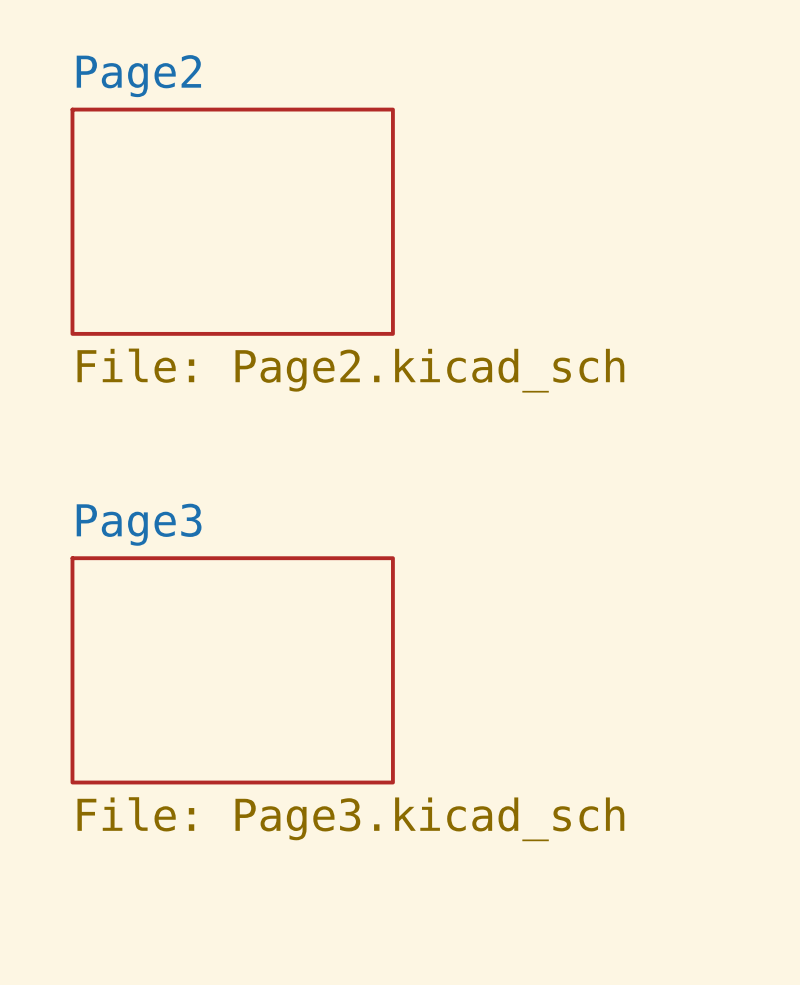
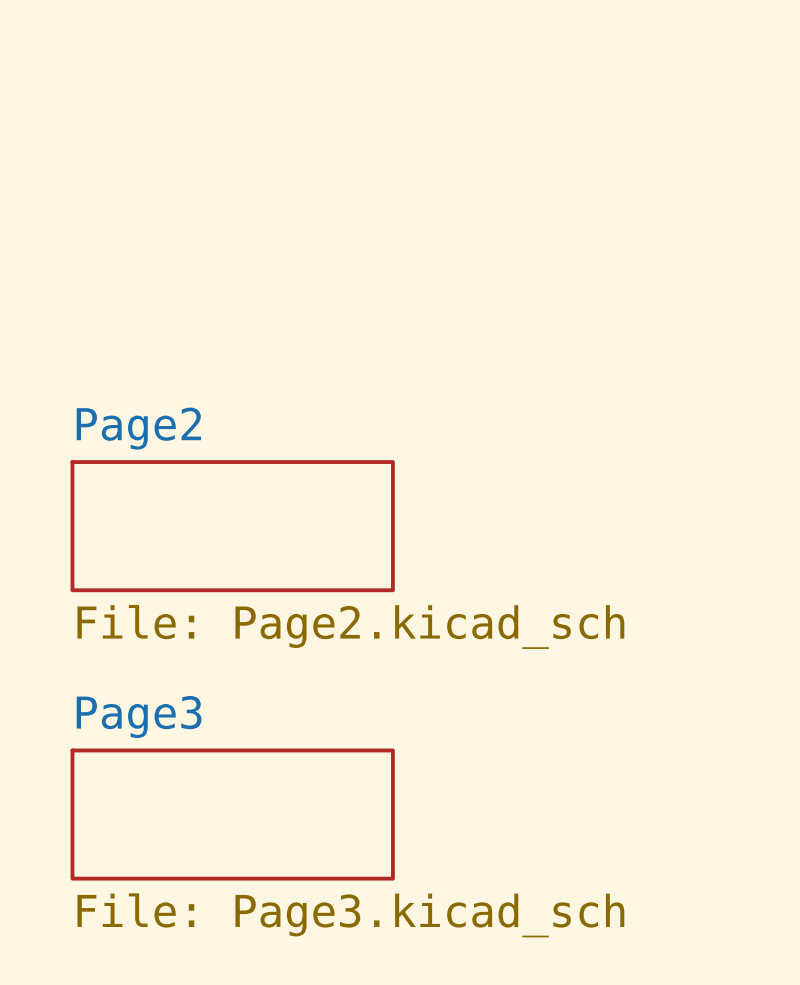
sheet Page2 shape: [70, 107, 395, 336] -> [70, 460, 395, 593]
sheet Page3 shape: [70, 556, 395, 785] -> [70, 748, 395, 881]

